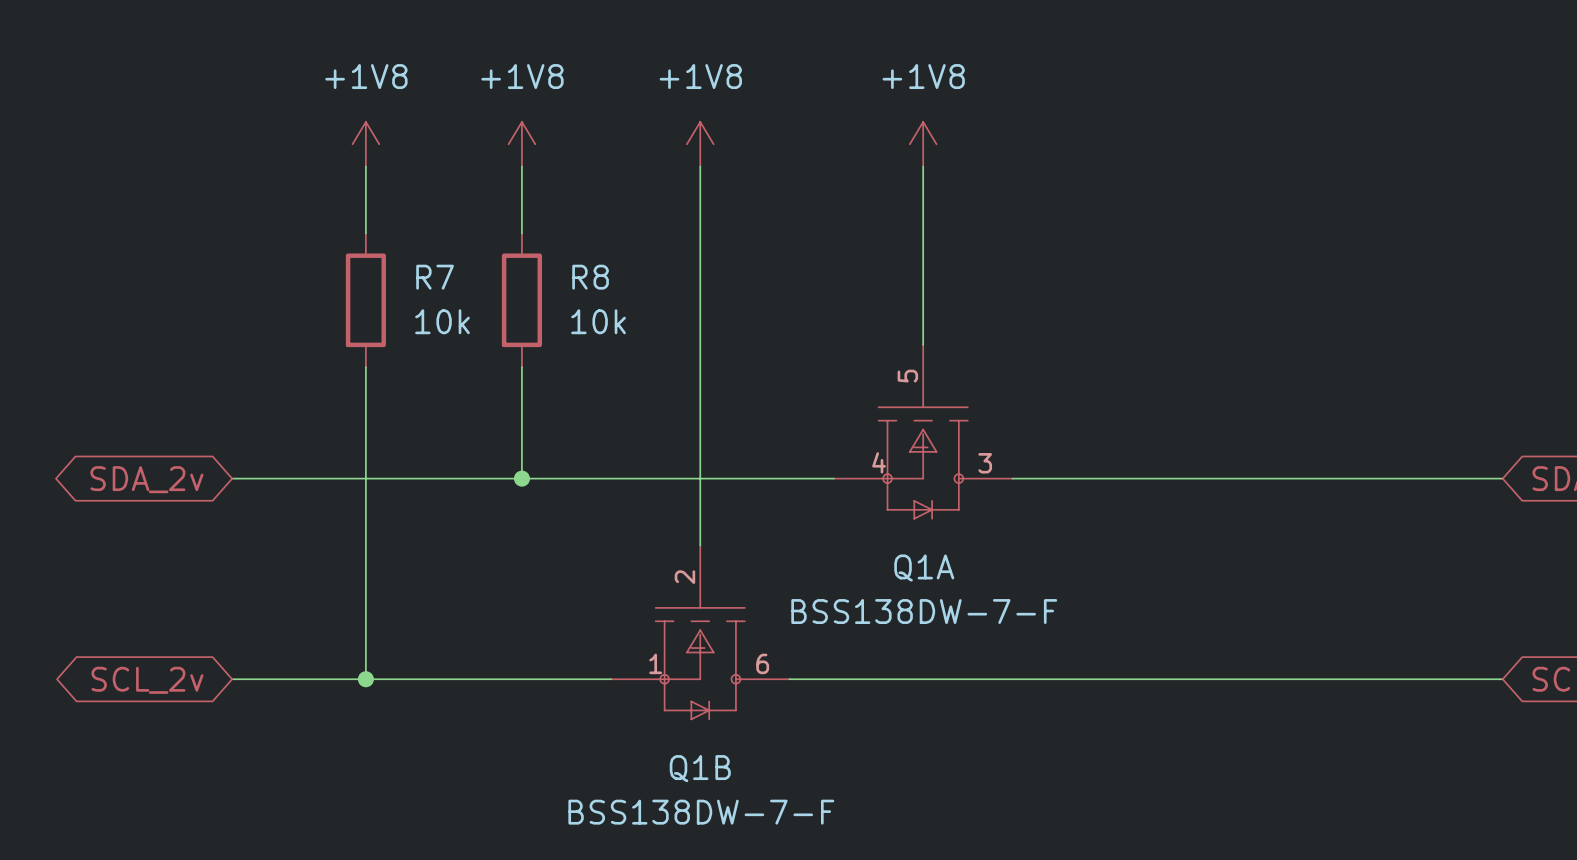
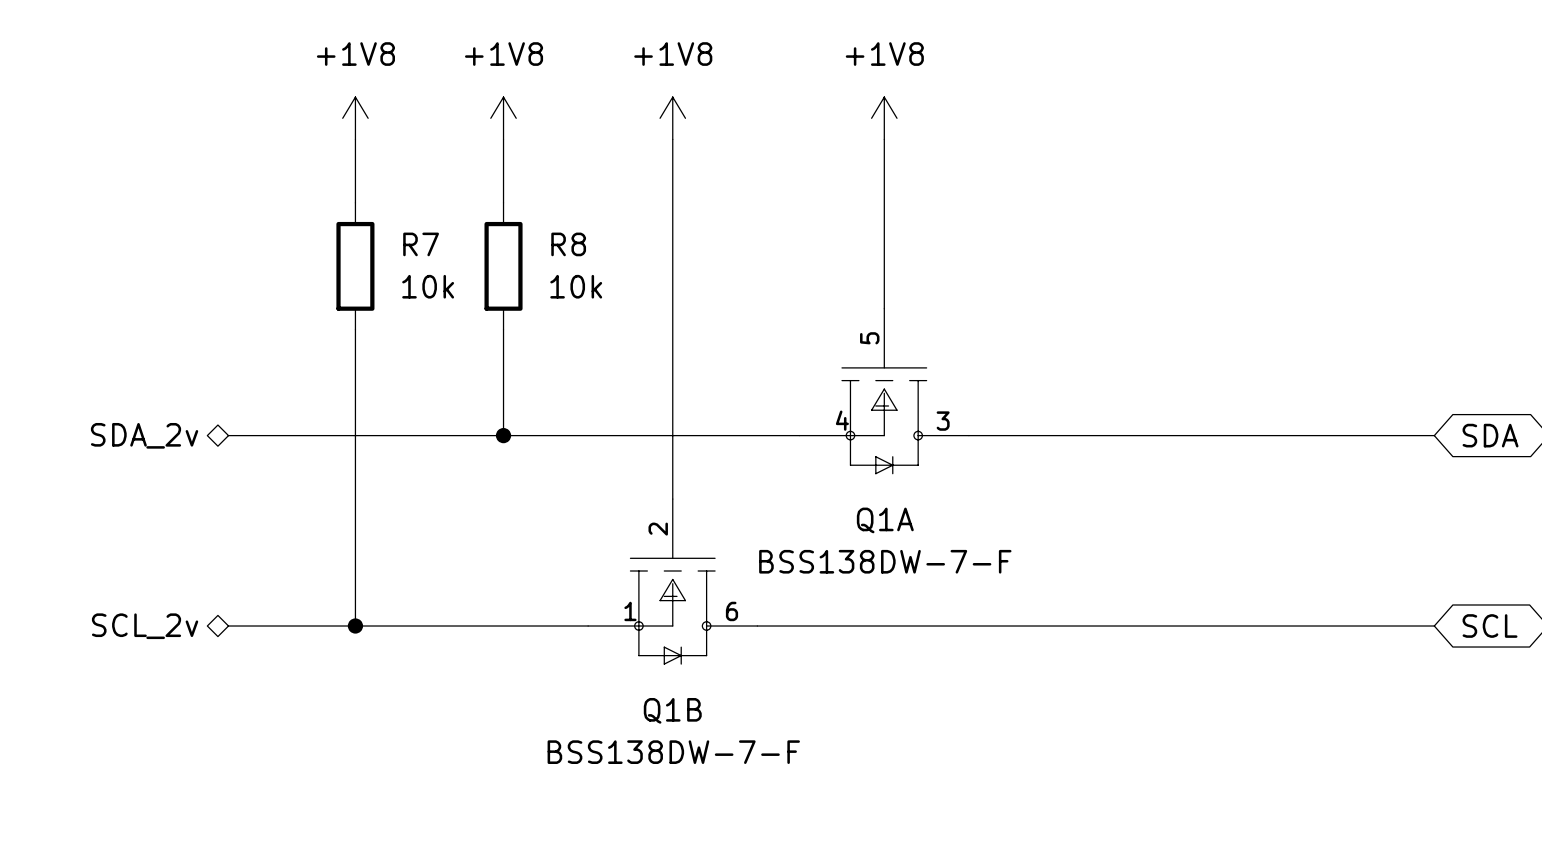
hierarchical label: none -> SDA_2v (144, 435)
global label: SDA_2v (146, 479) -> none
hierarchical label: none -> SCL_2v (145, 626)
global label: SCL_2v (147, 680) -> none

